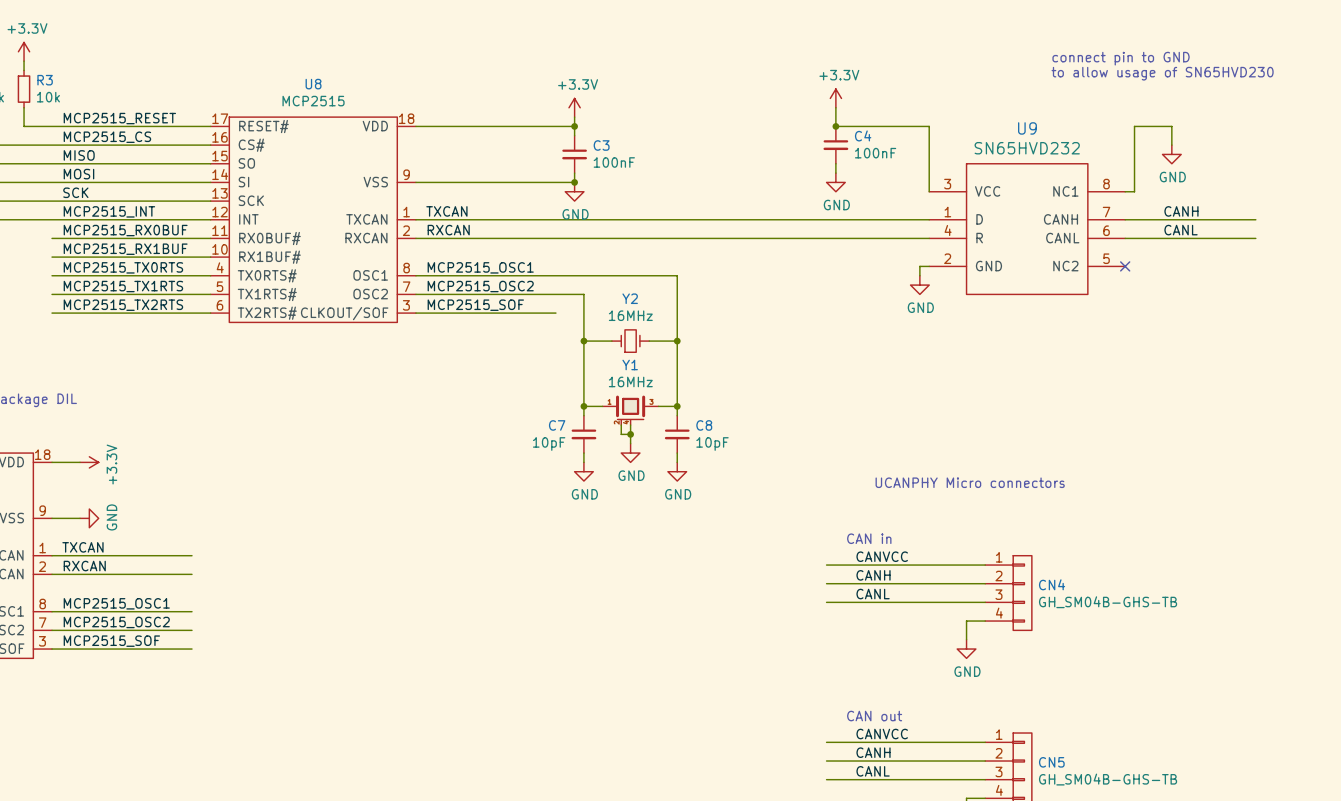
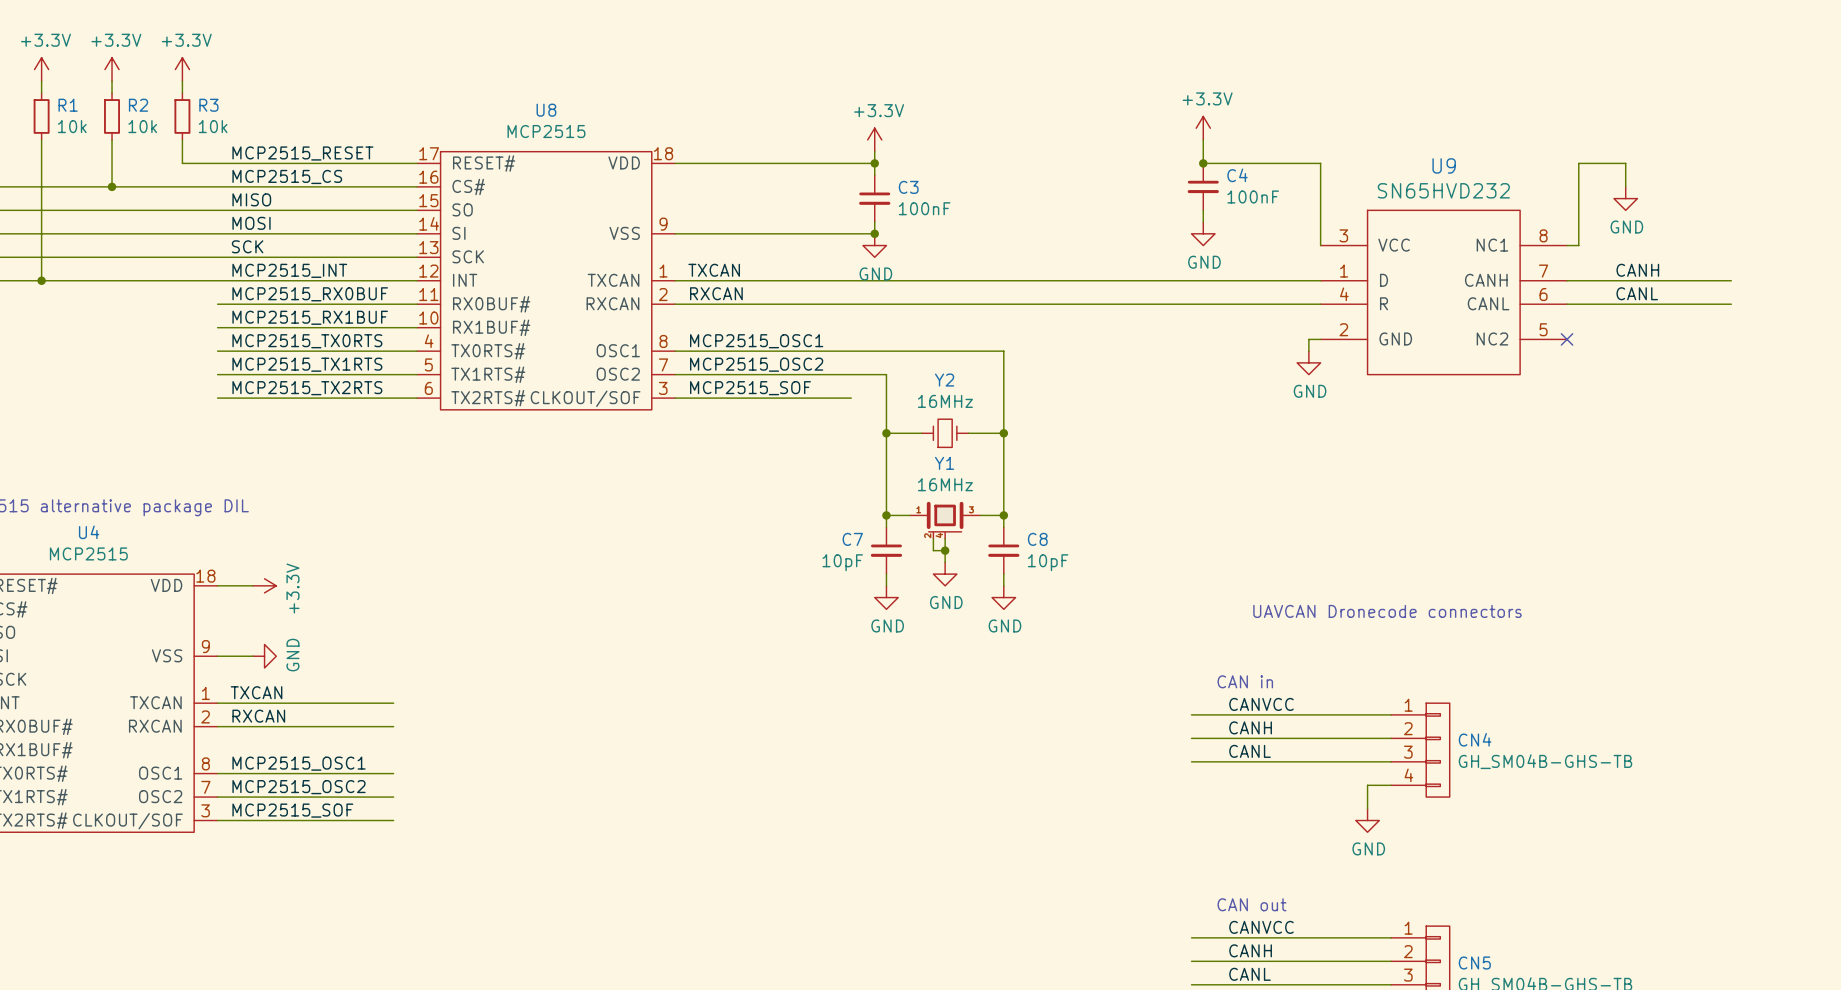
text: connect pin to GND (1121, 58) -> none
text: to allow usage of SN65HVD230 (1162, 73) -> none
text: UCANPHY Micro connectors (970, 482) -> UAVCAN Dronecode connectors (1387, 611)

